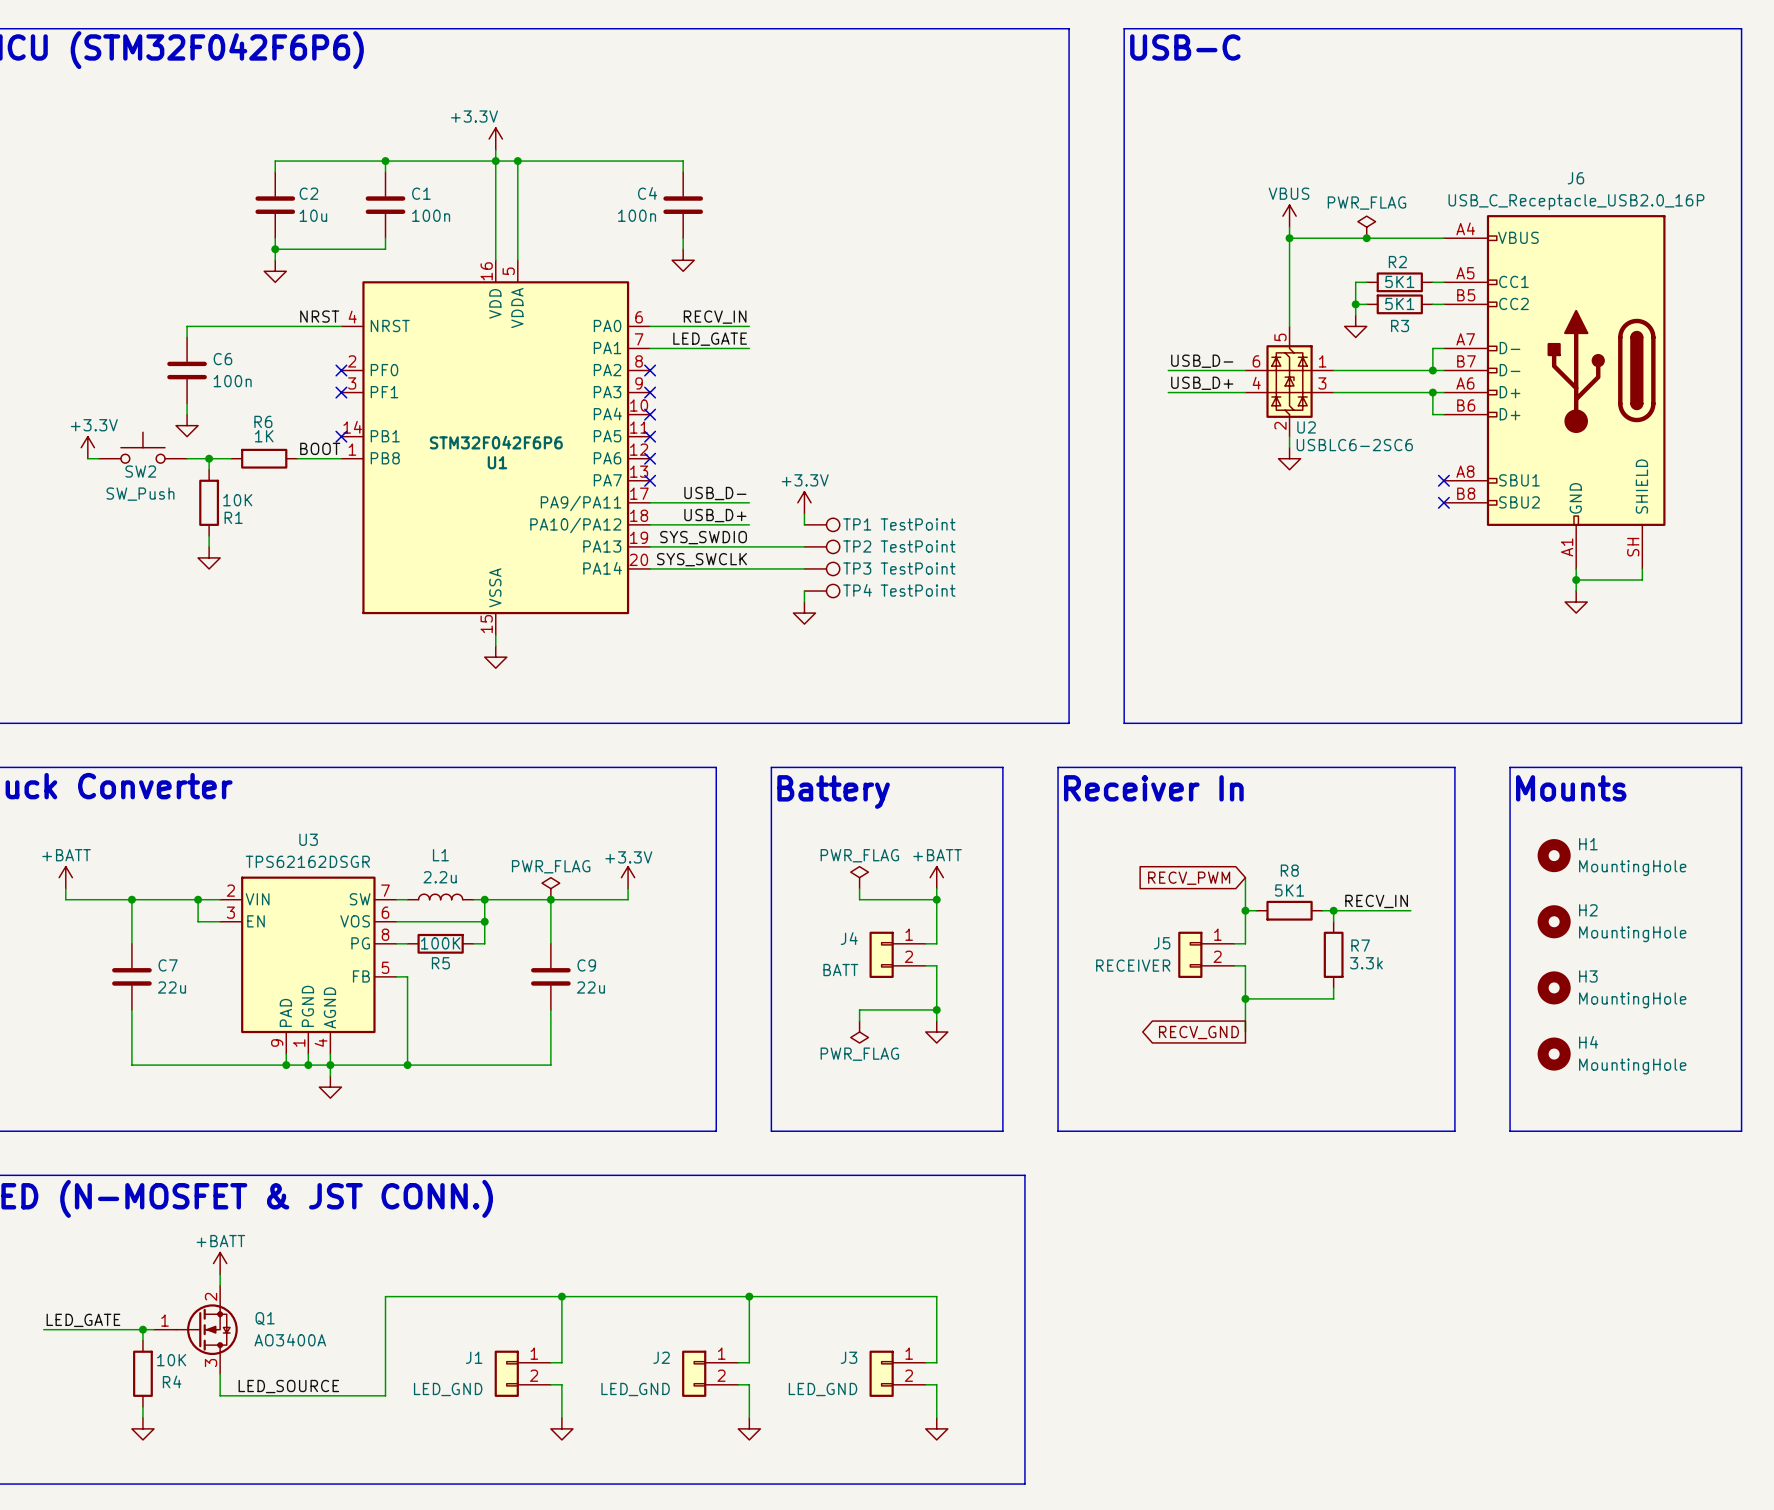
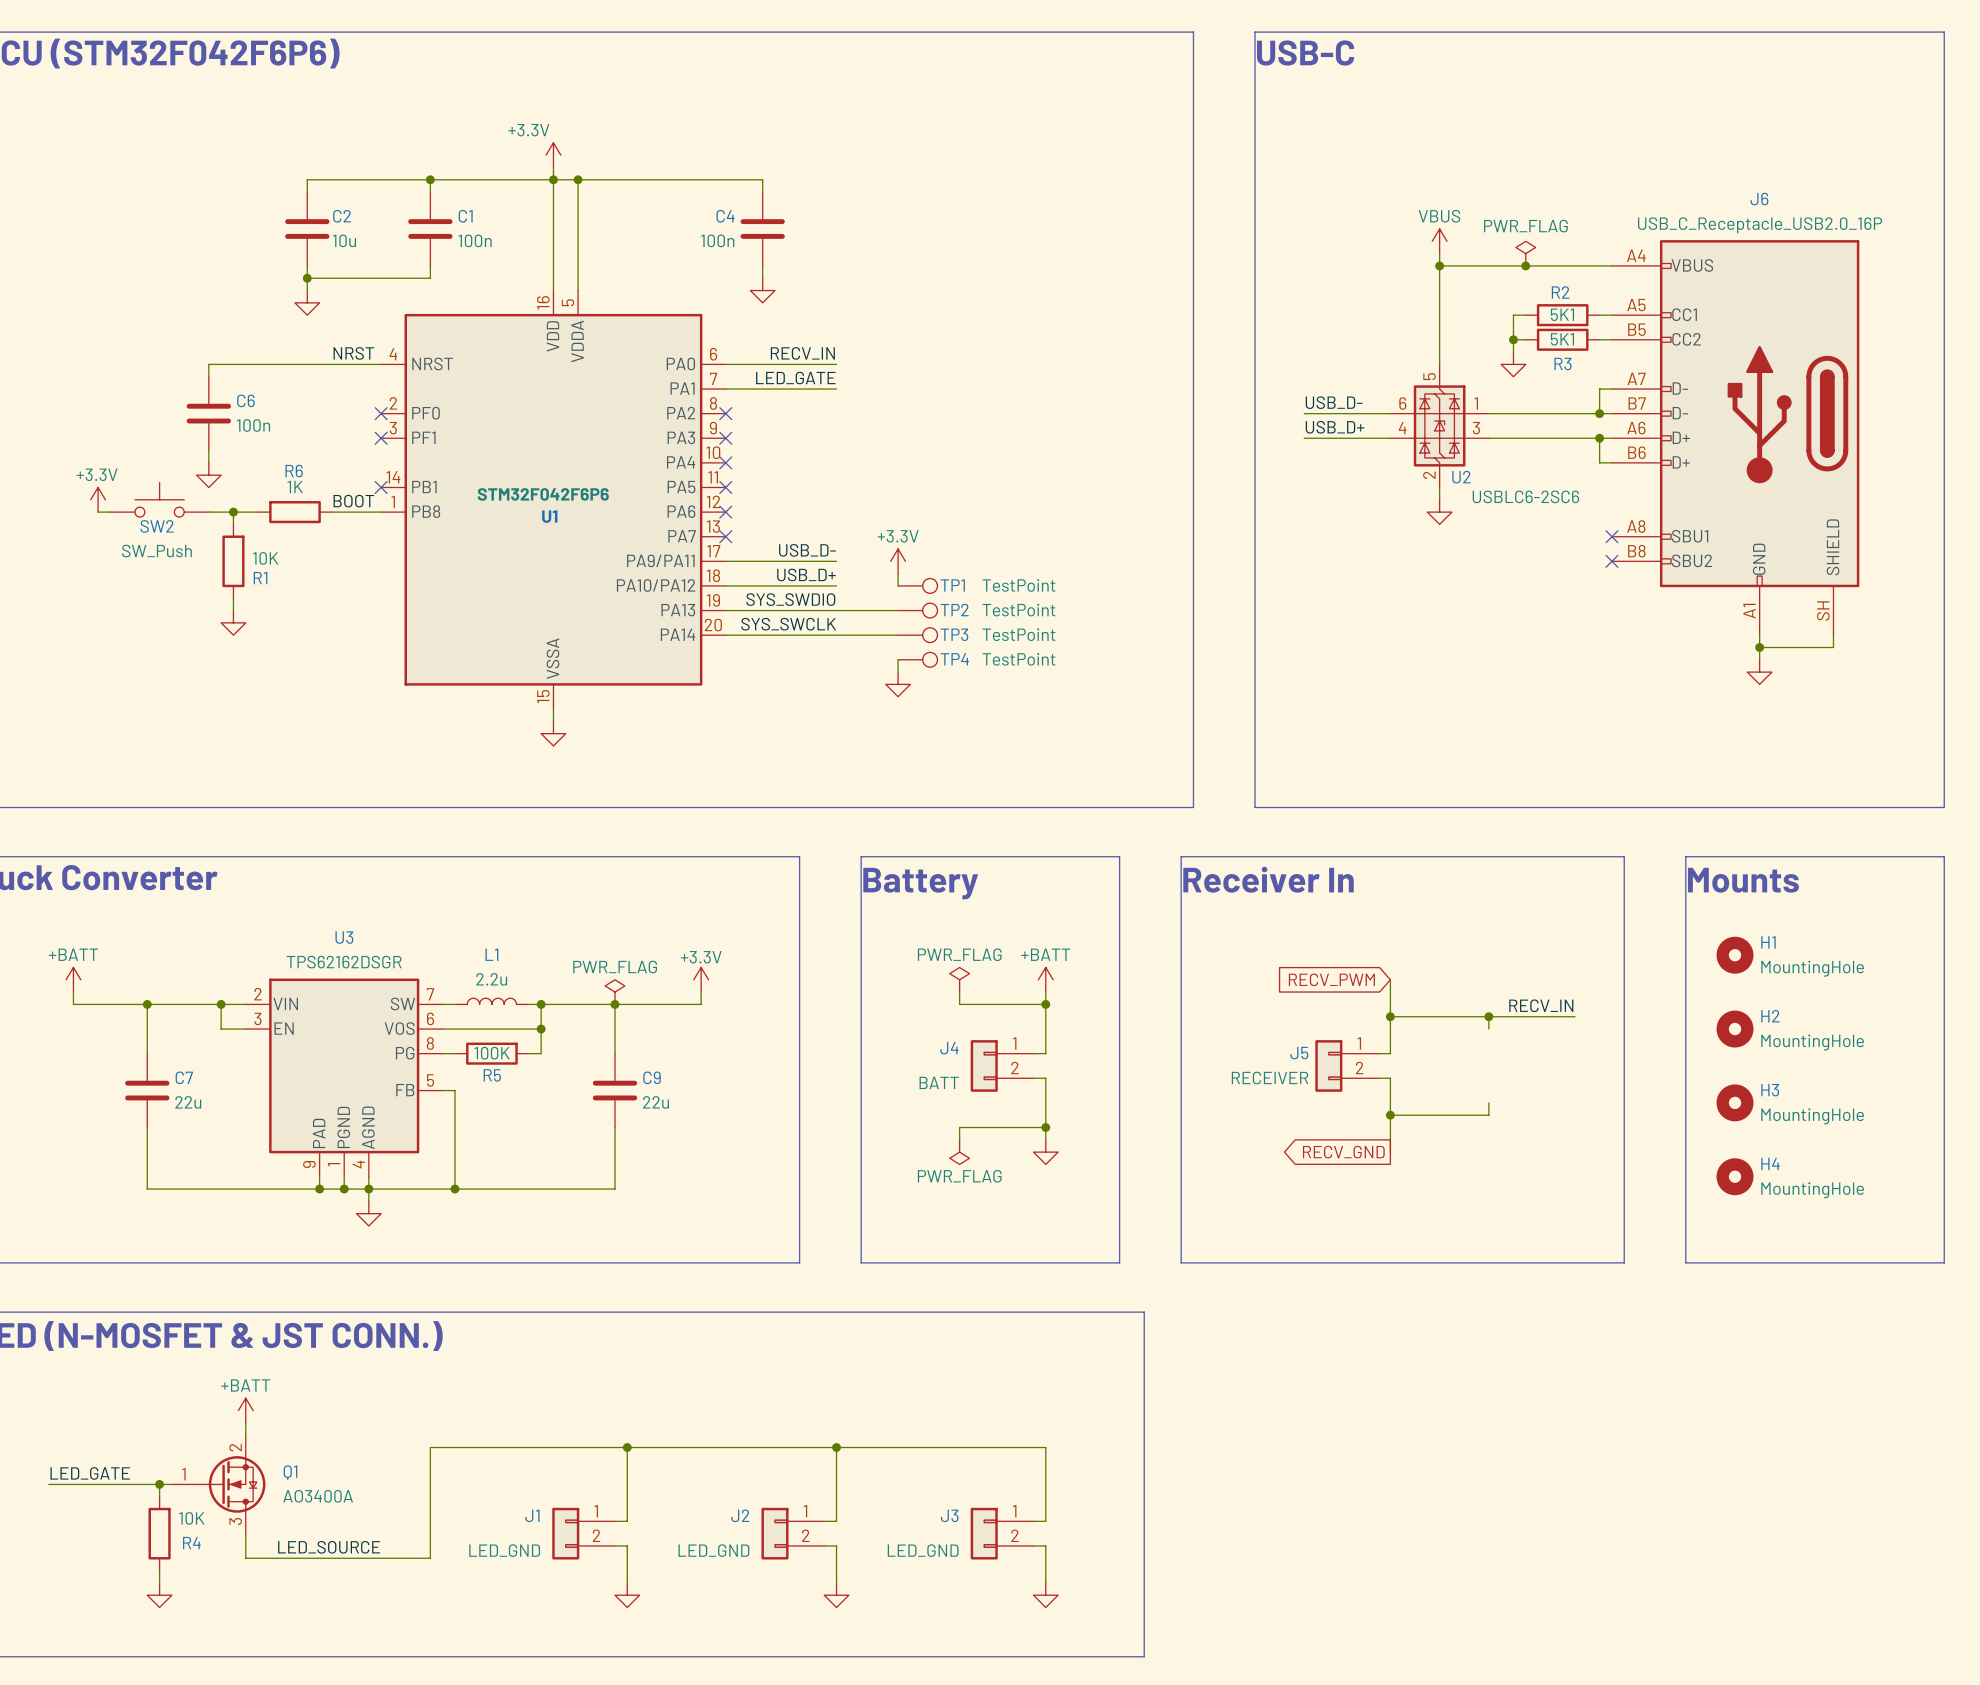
wire: none -> (1402, 1016) (1476, 1016)
R8: 5K1 (1289, 910) -> none
R7: 3.3k (1333, 954) -> none

